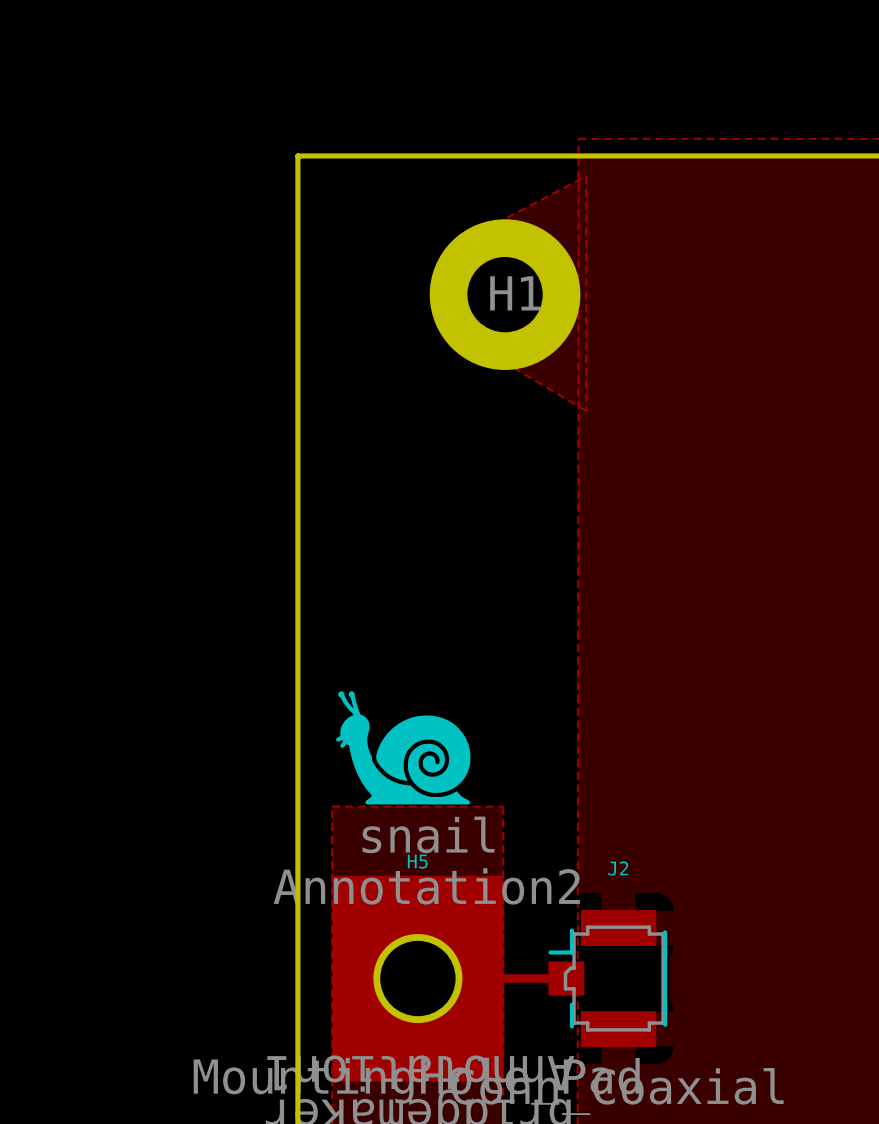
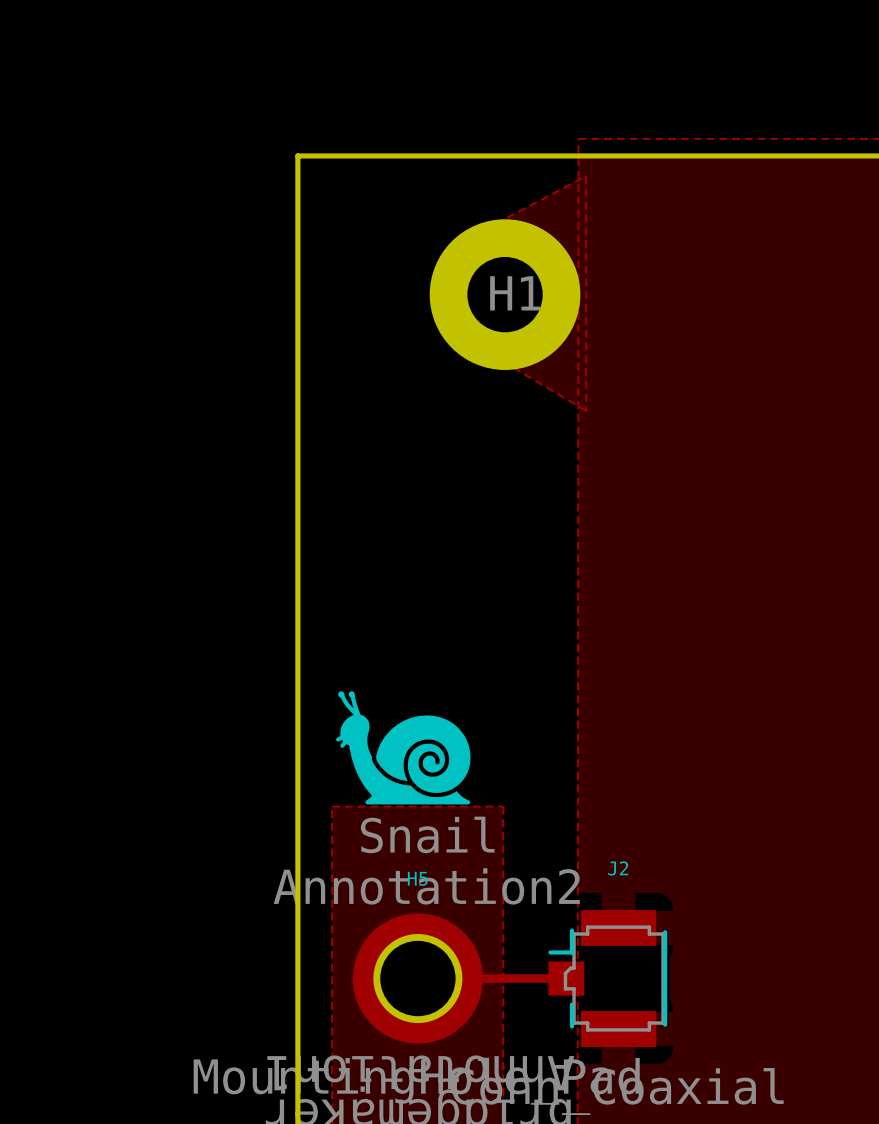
Annotation2 value: snail (428, 834) -> Snail (427, 834)
H5 footprint: [332, 875, 504, 1082] -> [352, 913, 483, 1044]

